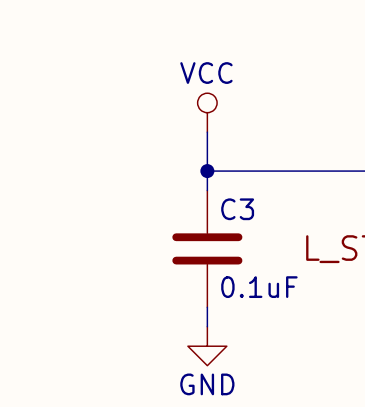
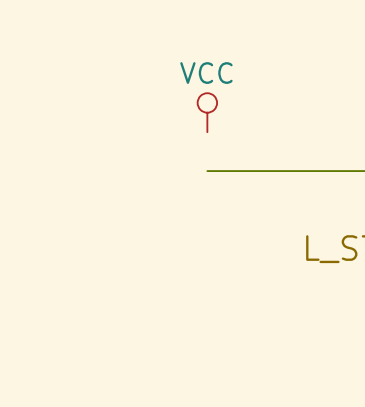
wire: (207, 132) (207, 190) -> none
junction: (207, 171) -> none
C3: 0.1uF (207, 248) -> none
wire: (207, 307) (207, 326) -> none
power symbol: GND (207, 346) -> none

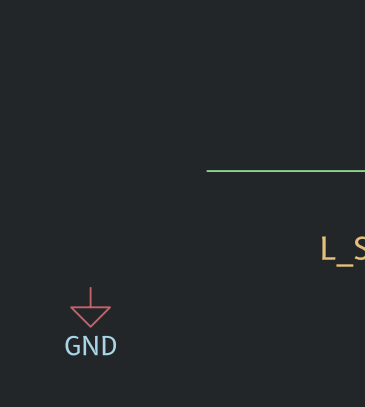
power symbol: VCC (207, 112) -> none
power symbol: none -> GND (90, 307)

